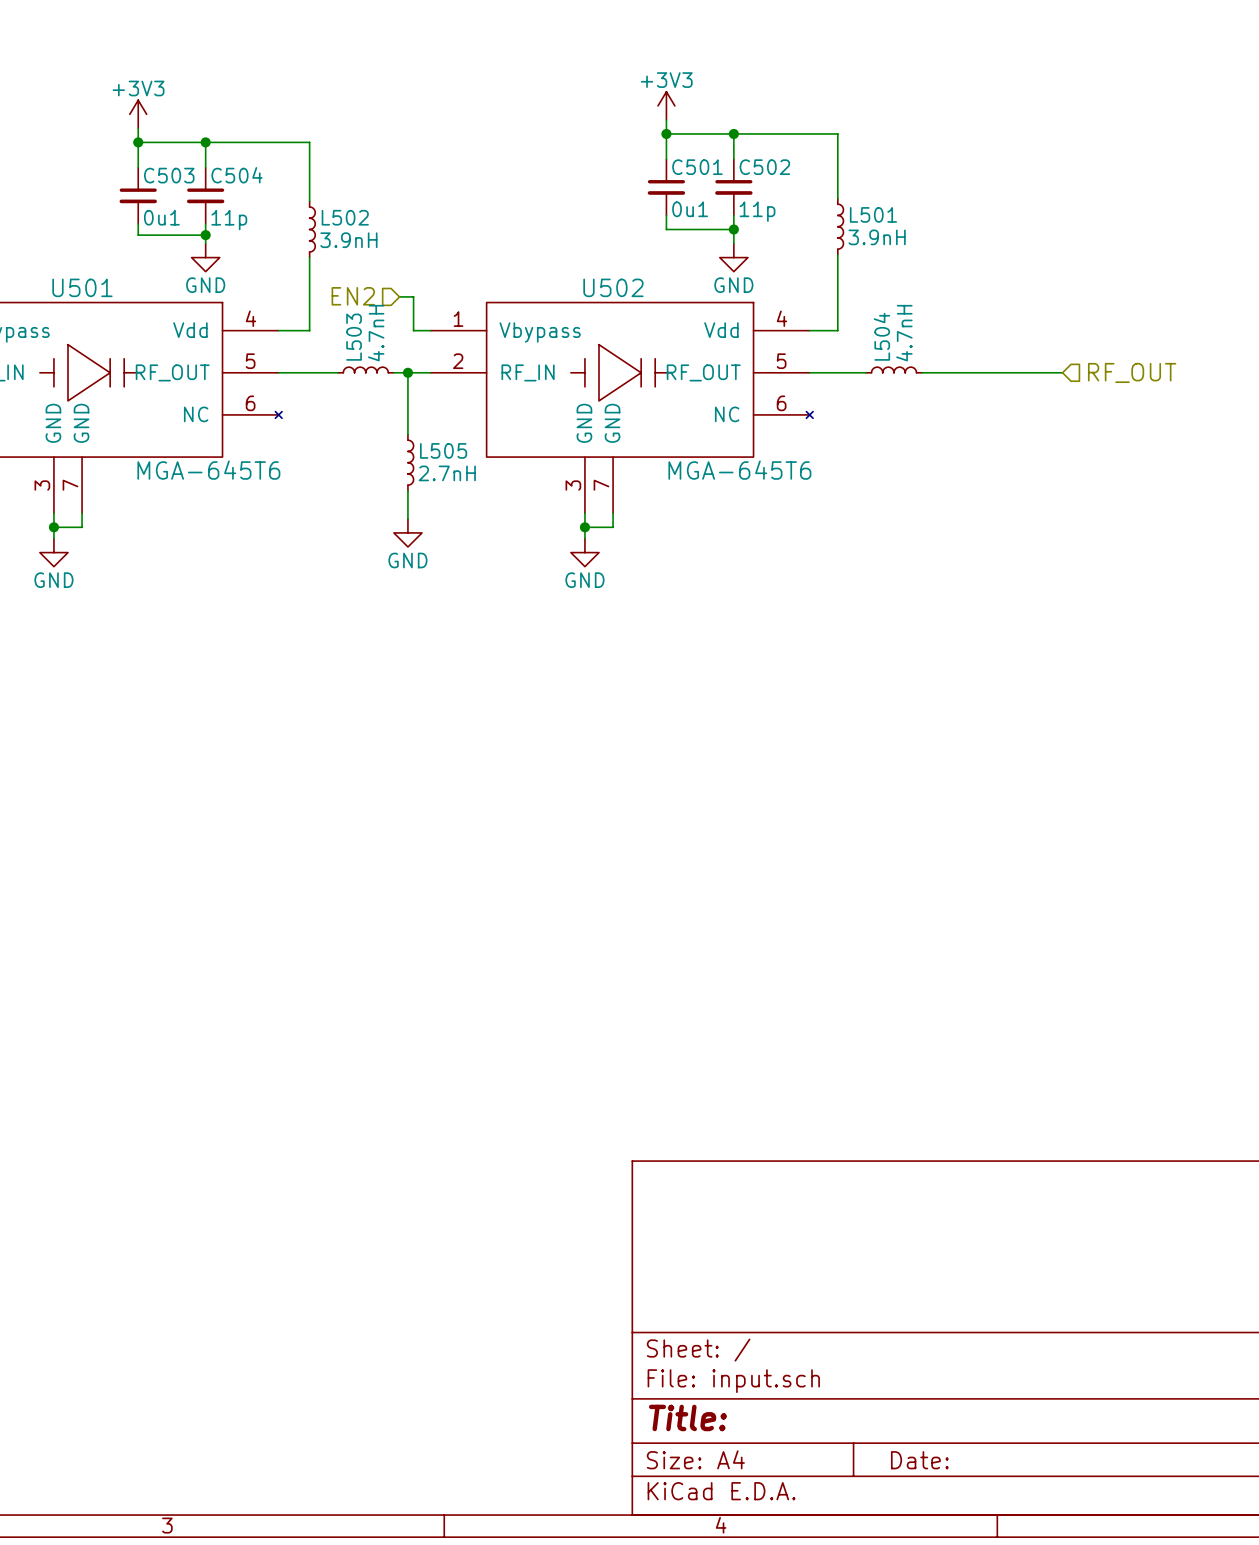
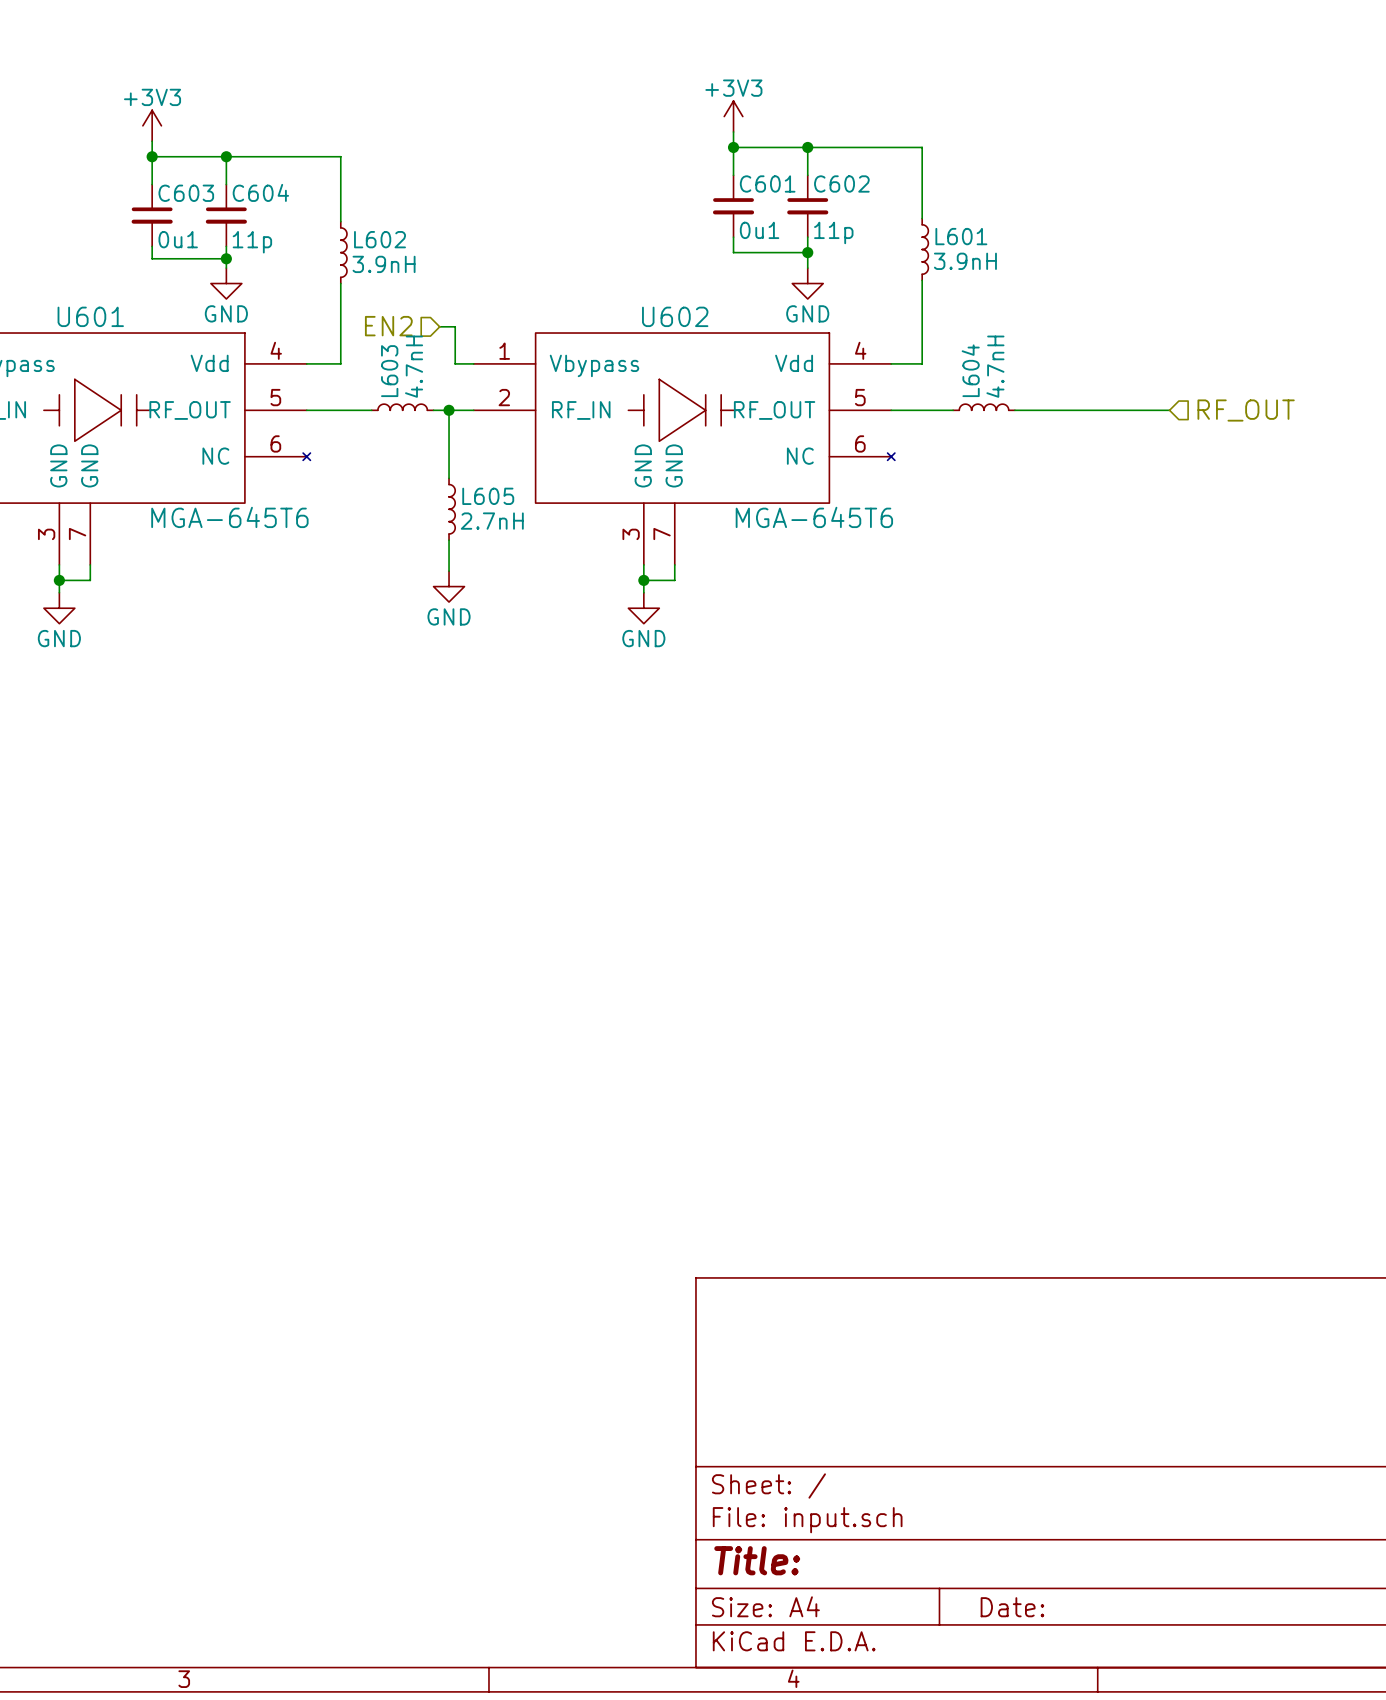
C501 name: C501 (697, 167) -> C601 (767, 183)
C502 name: C502 (764, 167) -> C602 (841, 183)
C503 name: C503 (169, 175) -> C603 (186, 193)
C504 name: C504 (237, 175) -> C604 (260, 192)
L501 name: L501 (873, 214) -> L601 (961, 236)
L502 name: L502 (345, 217) -> L602 (380, 239)
U501 name: U501 (82, 287) -> U601 (90, 316)
U502 name: U502 (613, 287) -> U602 (675, 316)
L504 name: L504 (881, 336) -> L604 (970, 370)
L503 name: L503 (354, 337) -> L603 (389, 371)
L505 name: L505 (443, 450) -> L605 (488, 496)

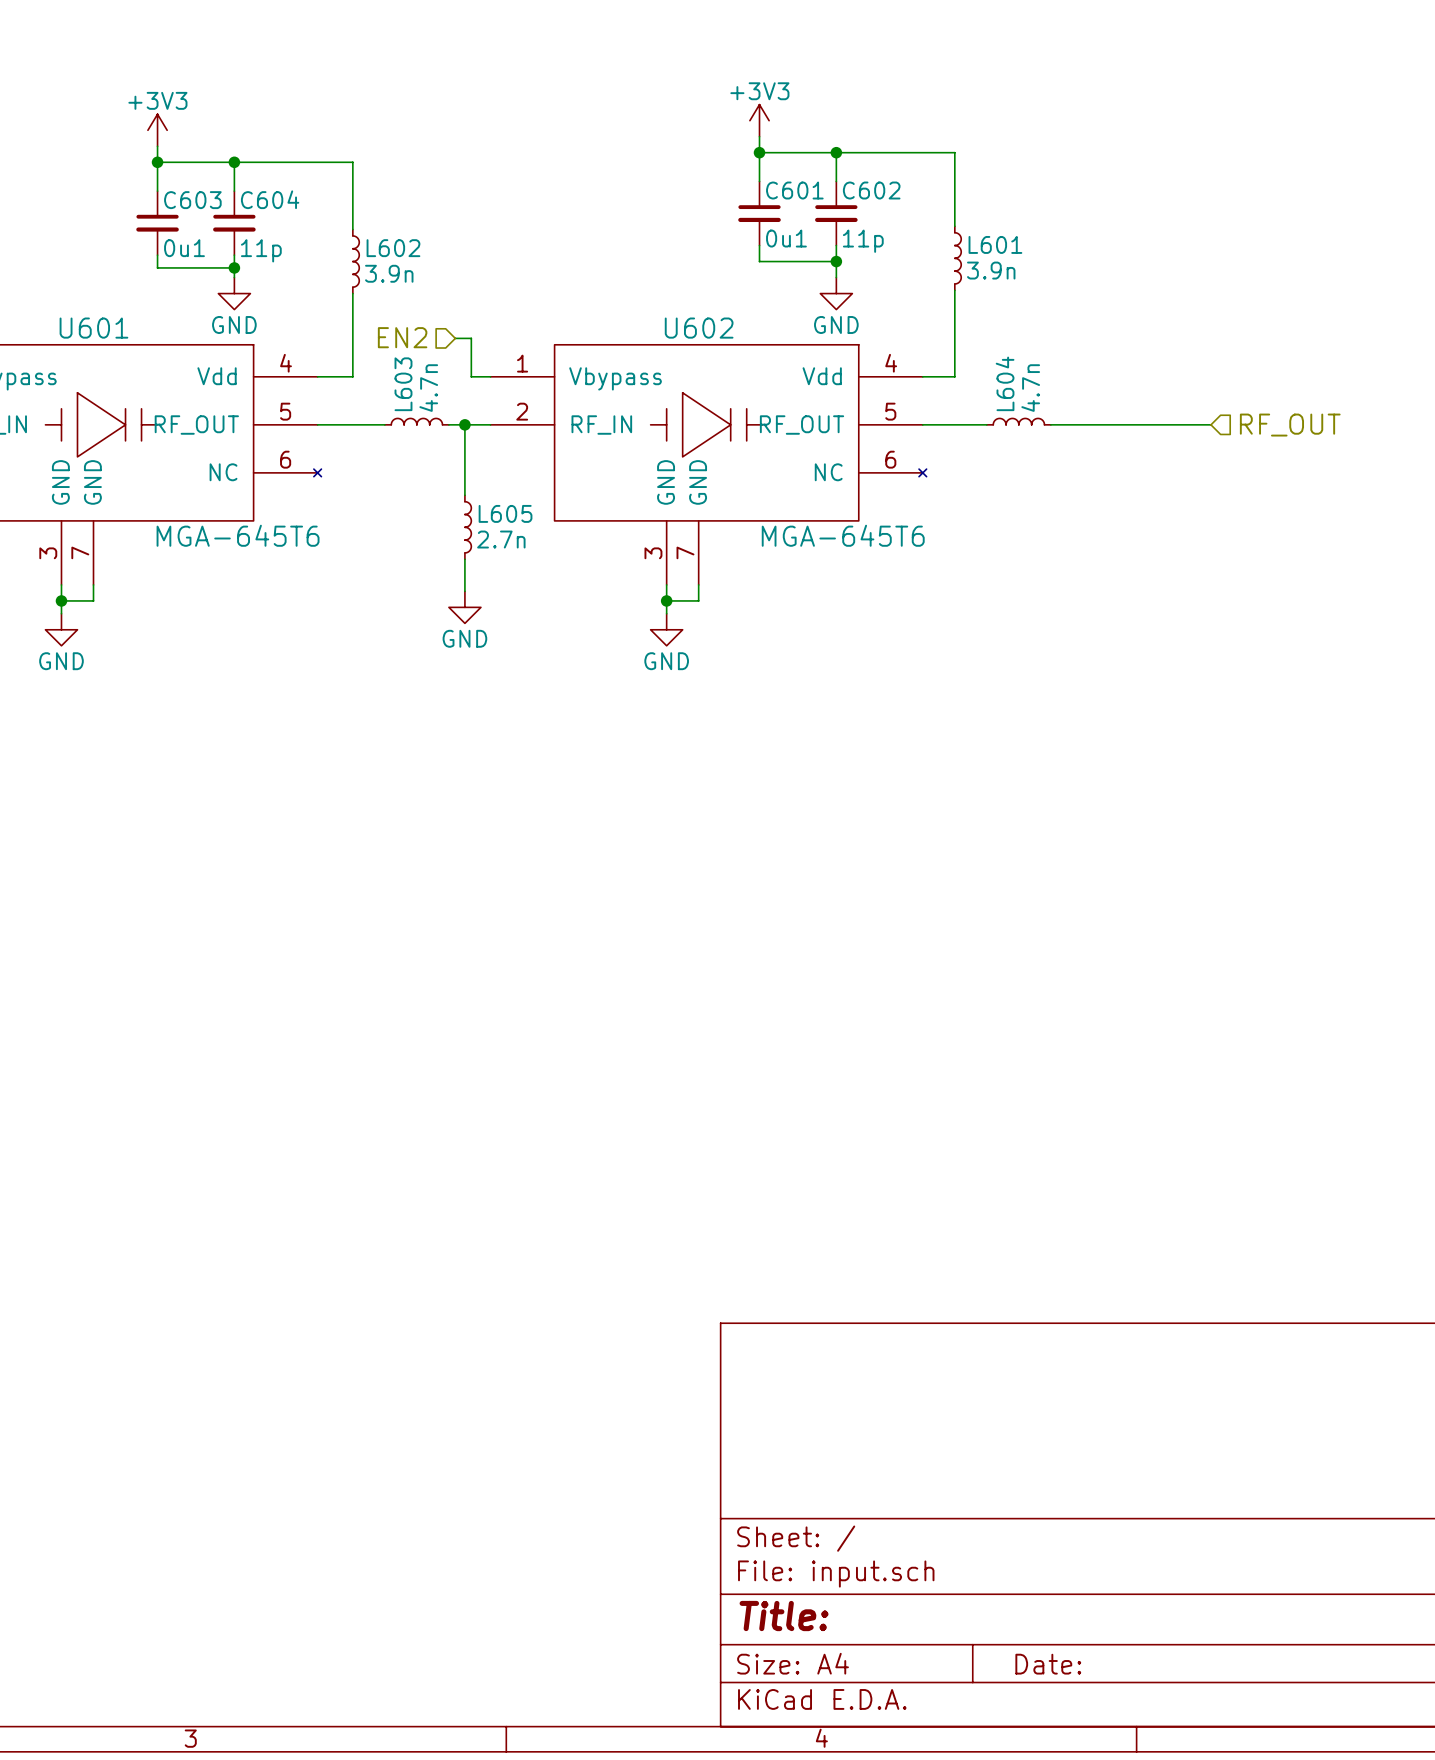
L601 value: 3.9nH (965, 261) -> 3.9n (991, 270)
L602 value: 3.9nH (384, 264) -> 3.9n (389, 273)
L603 value: 4.7nH (414, 366) -> 4.7n (428, 388)
L604 value: 4.7nH (995, 366) -> 4.7n (1030, 388)
L605 value: 2.7nH (492, 521) -> 2.7n (501, 539)

